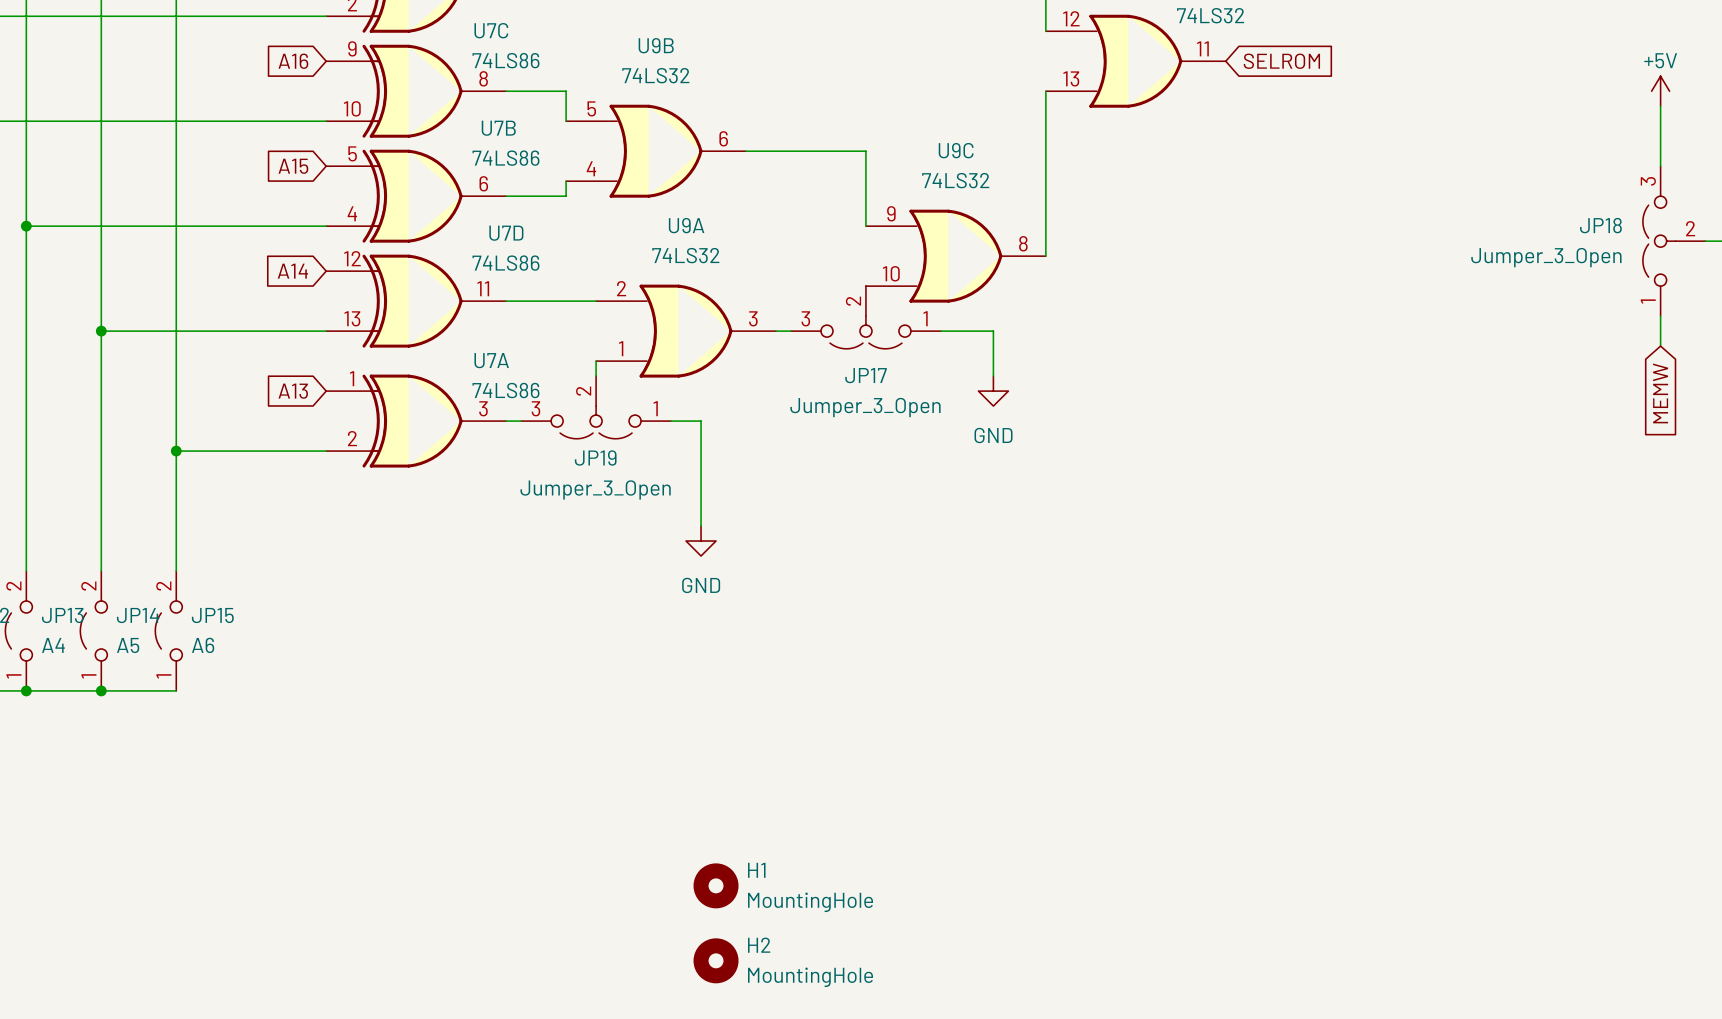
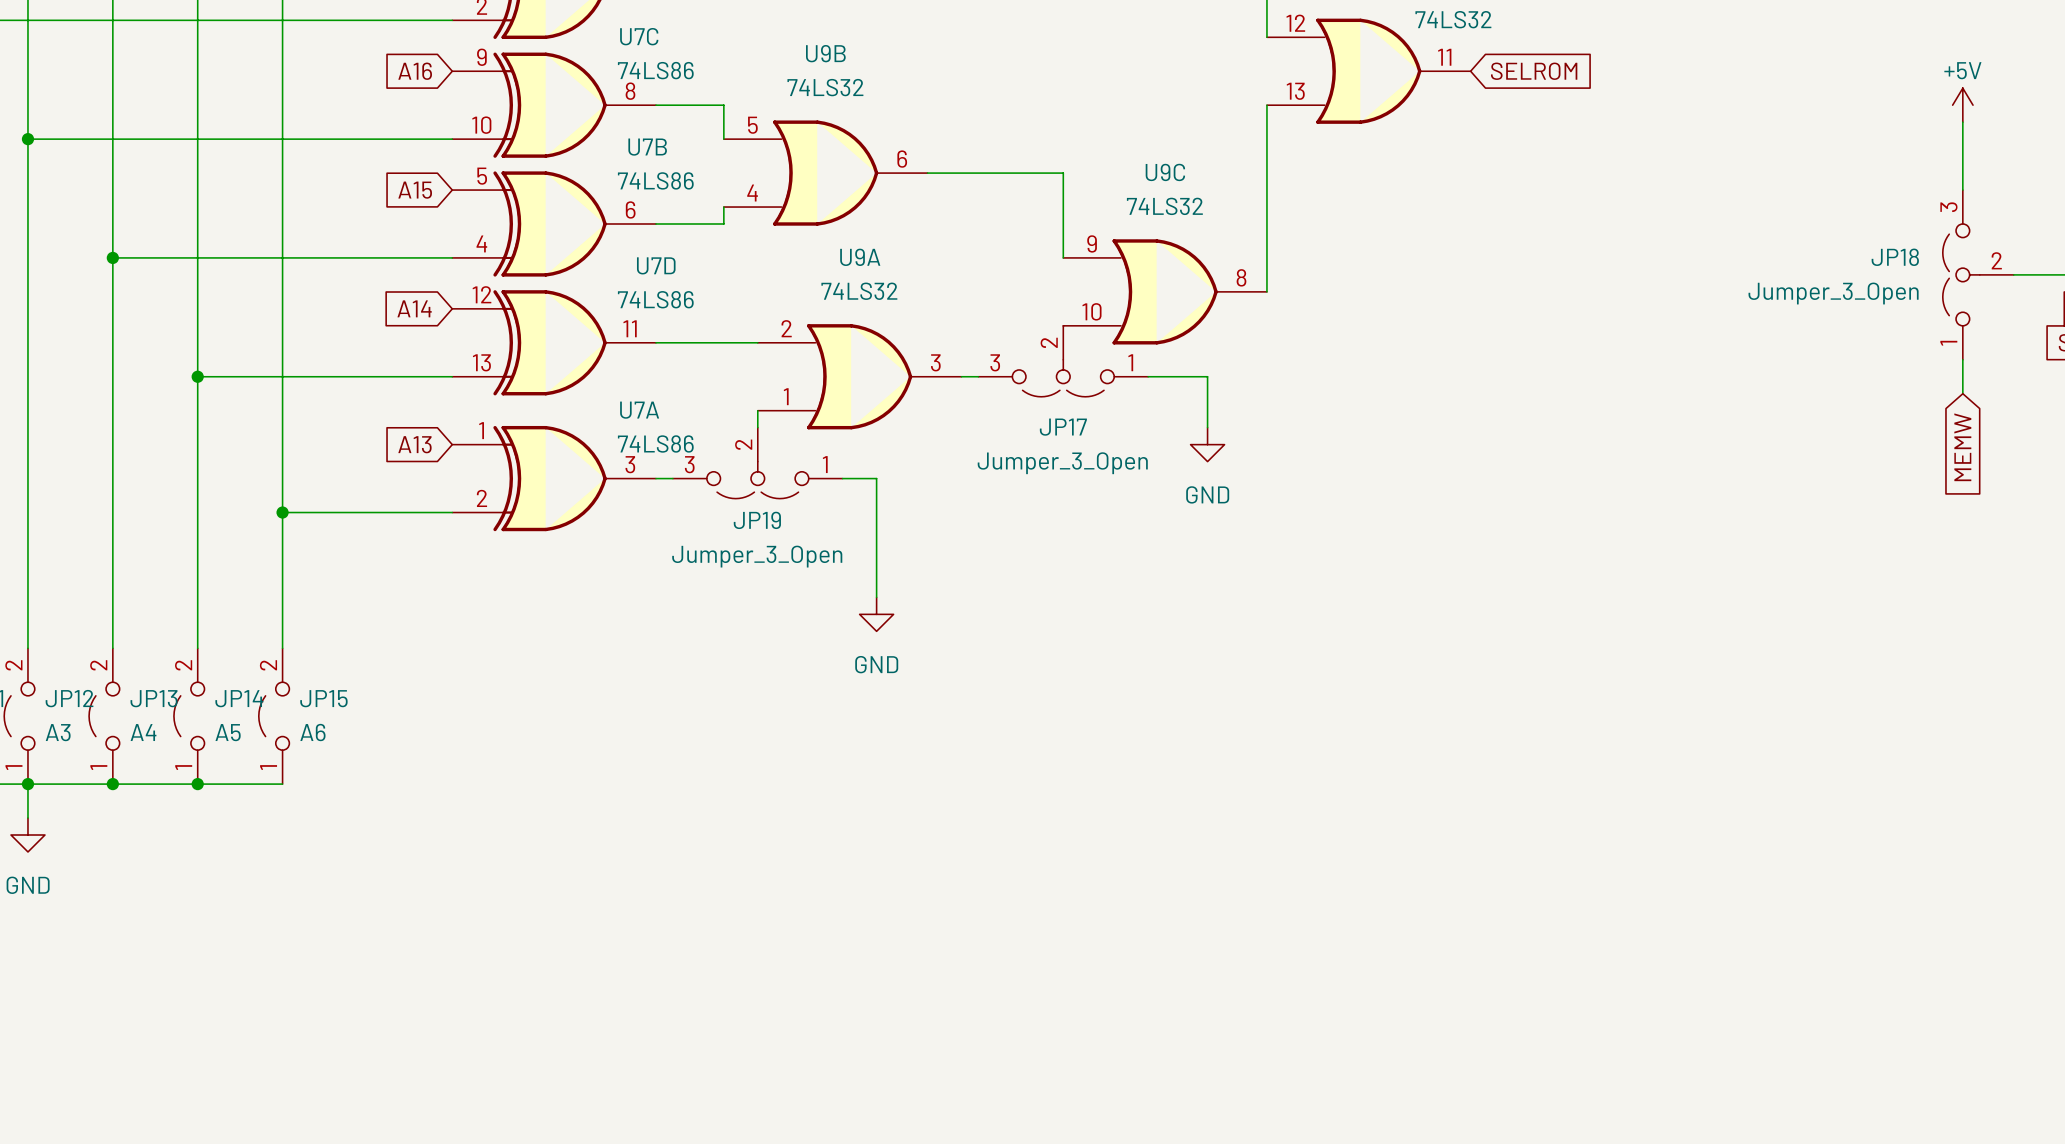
H1: MountingHole (716, 885) -> none
H2: MountingHole (716, 960) -> none

